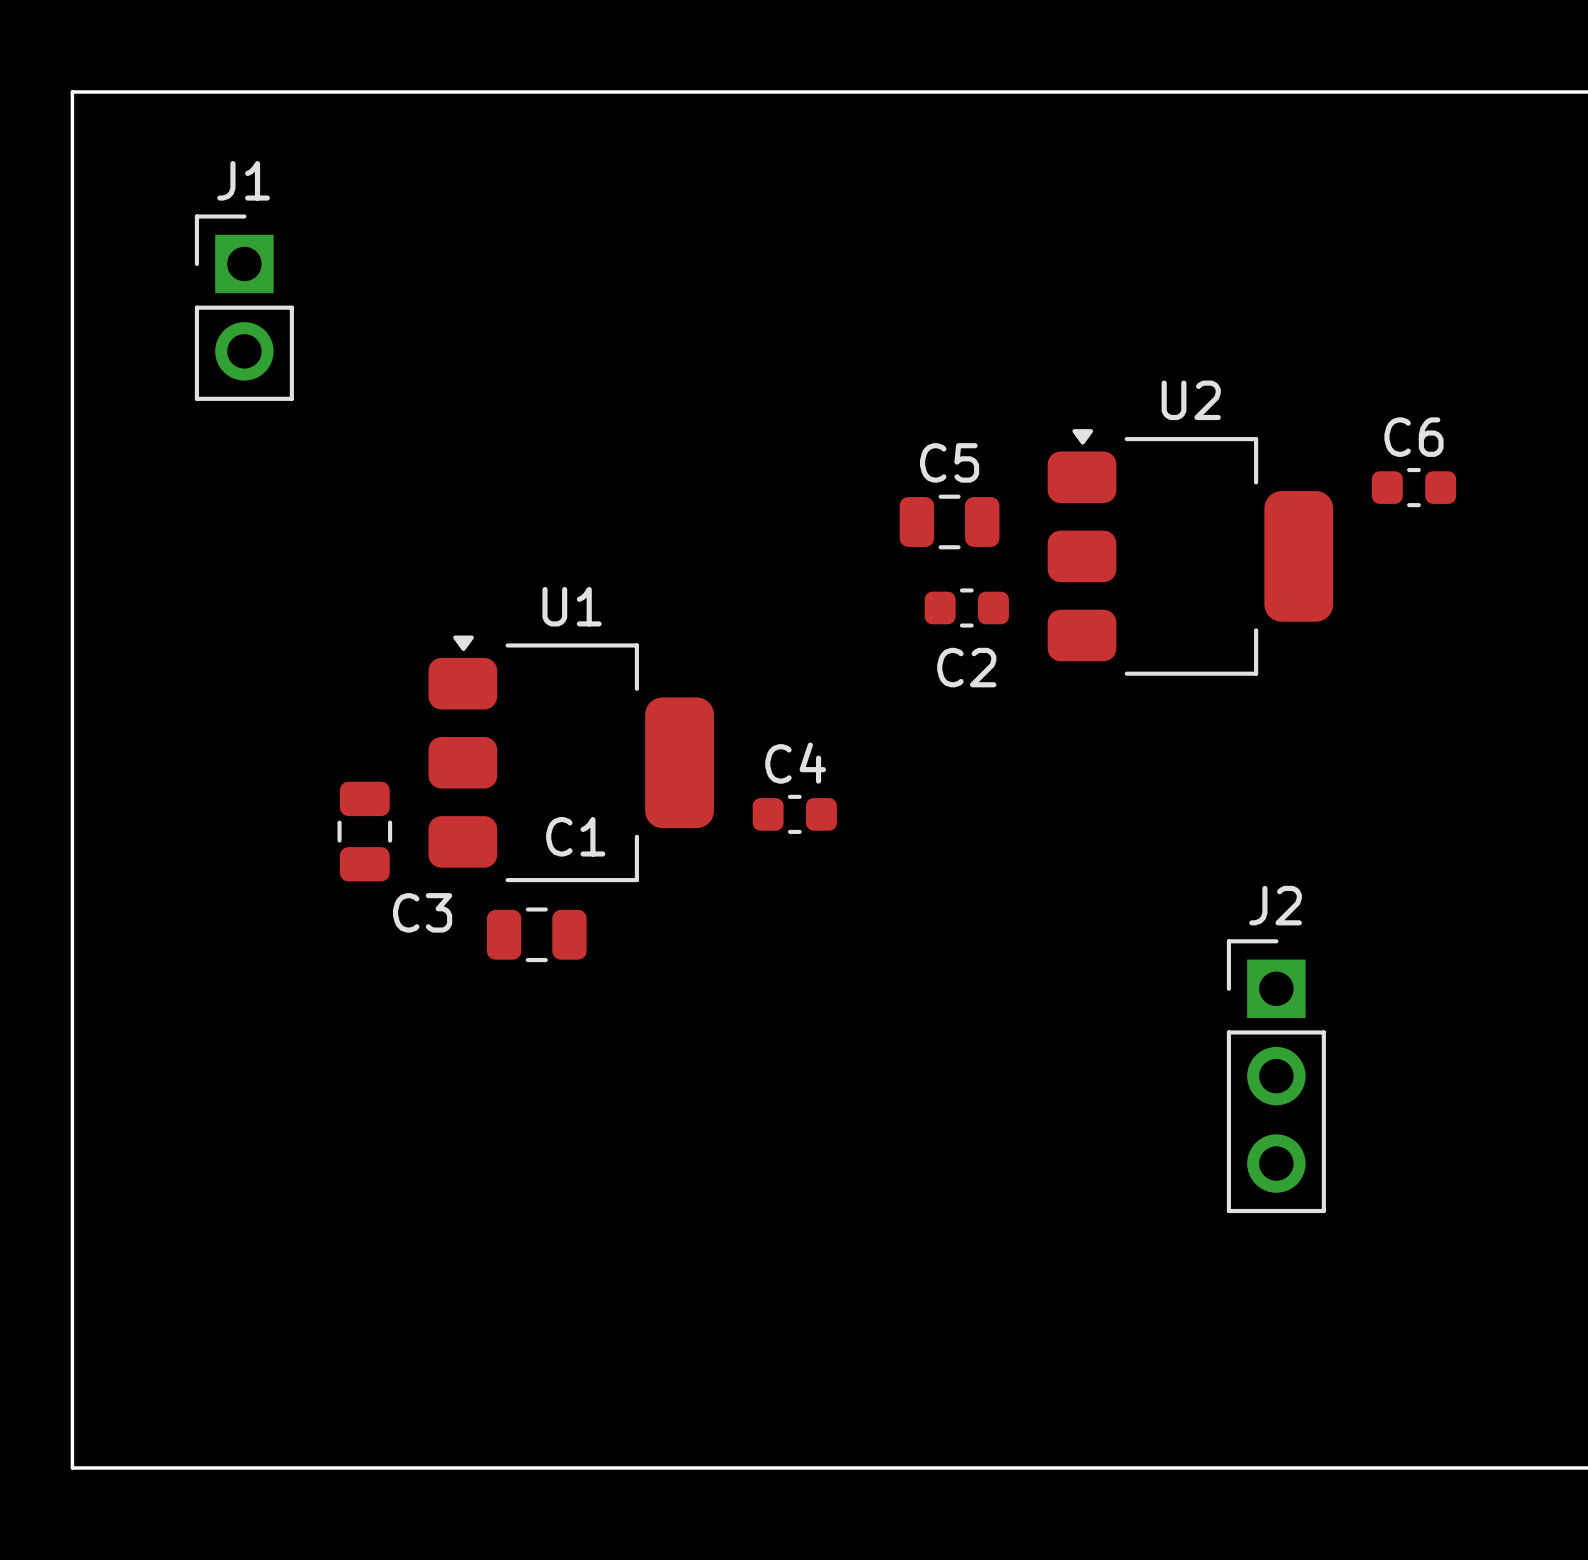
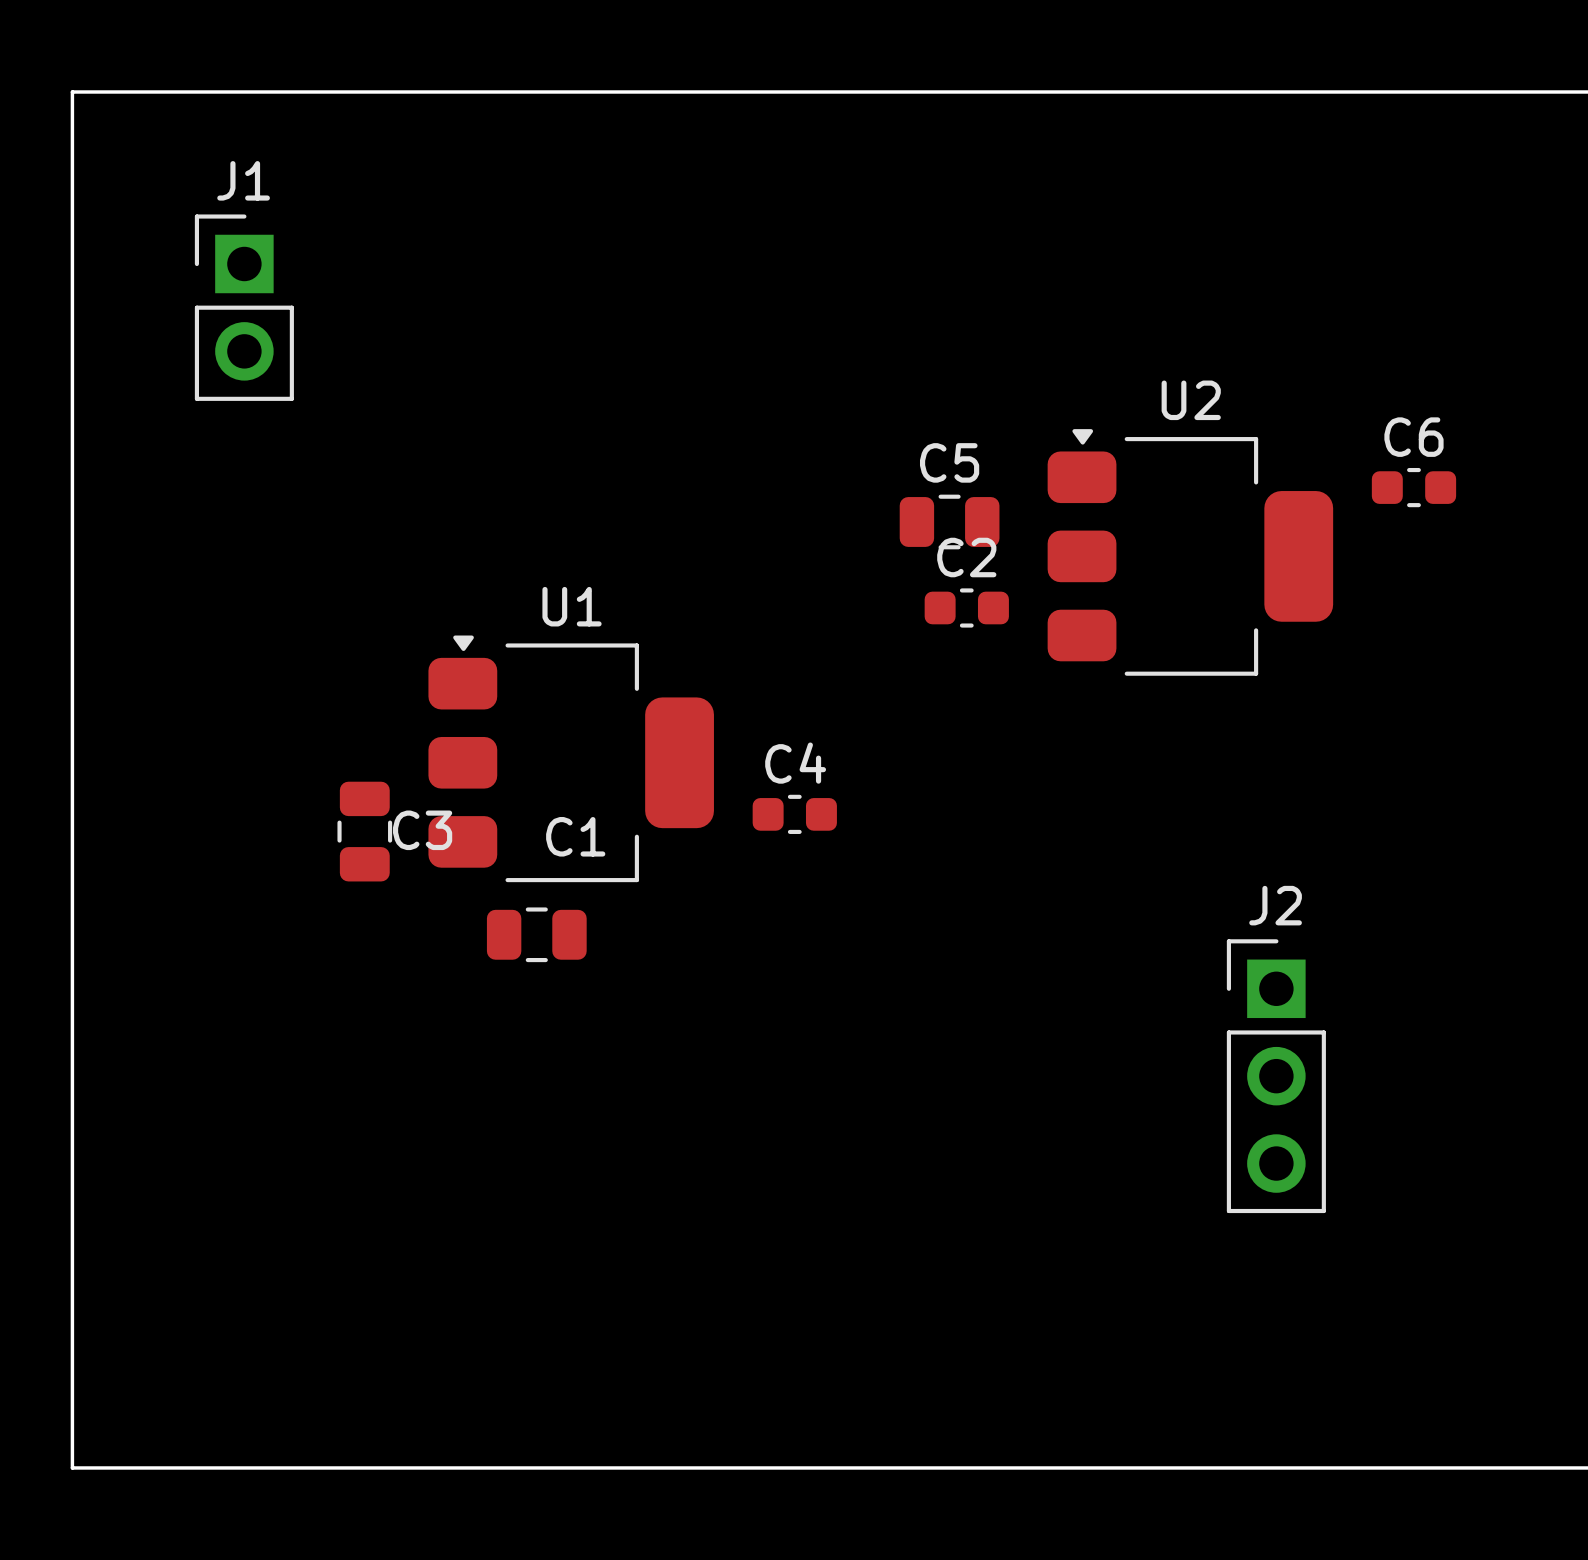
C2 name position: C2 (966, 667) -> C2 (966, 557)
C3 name position: C3 (422, 912) -> C3 (422, 830)

